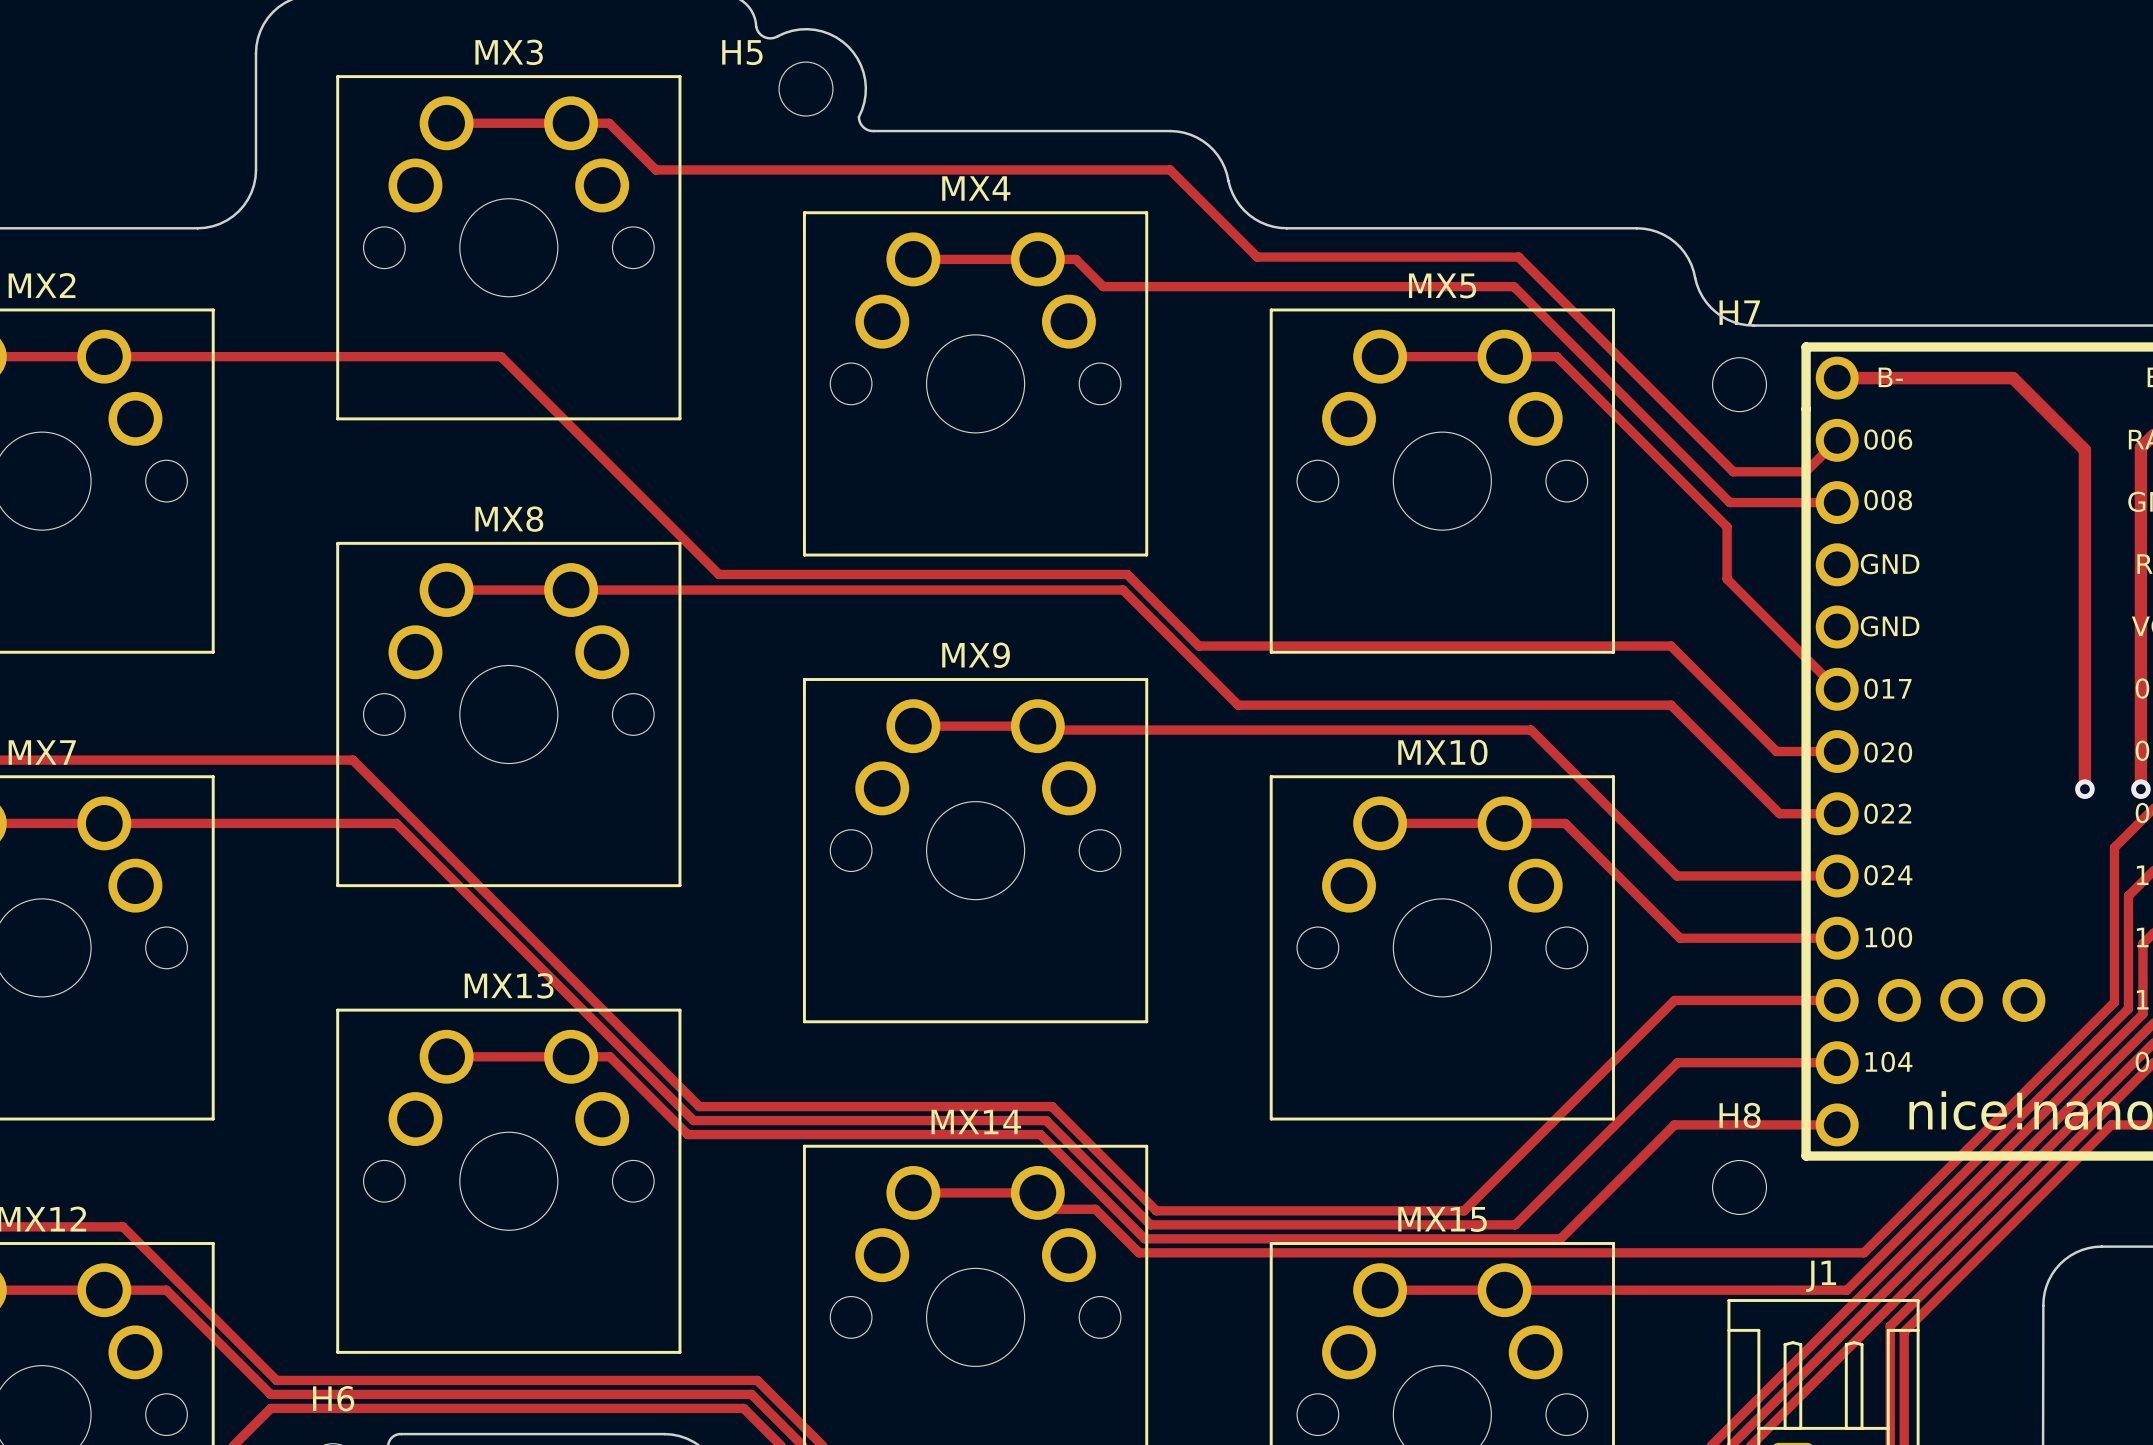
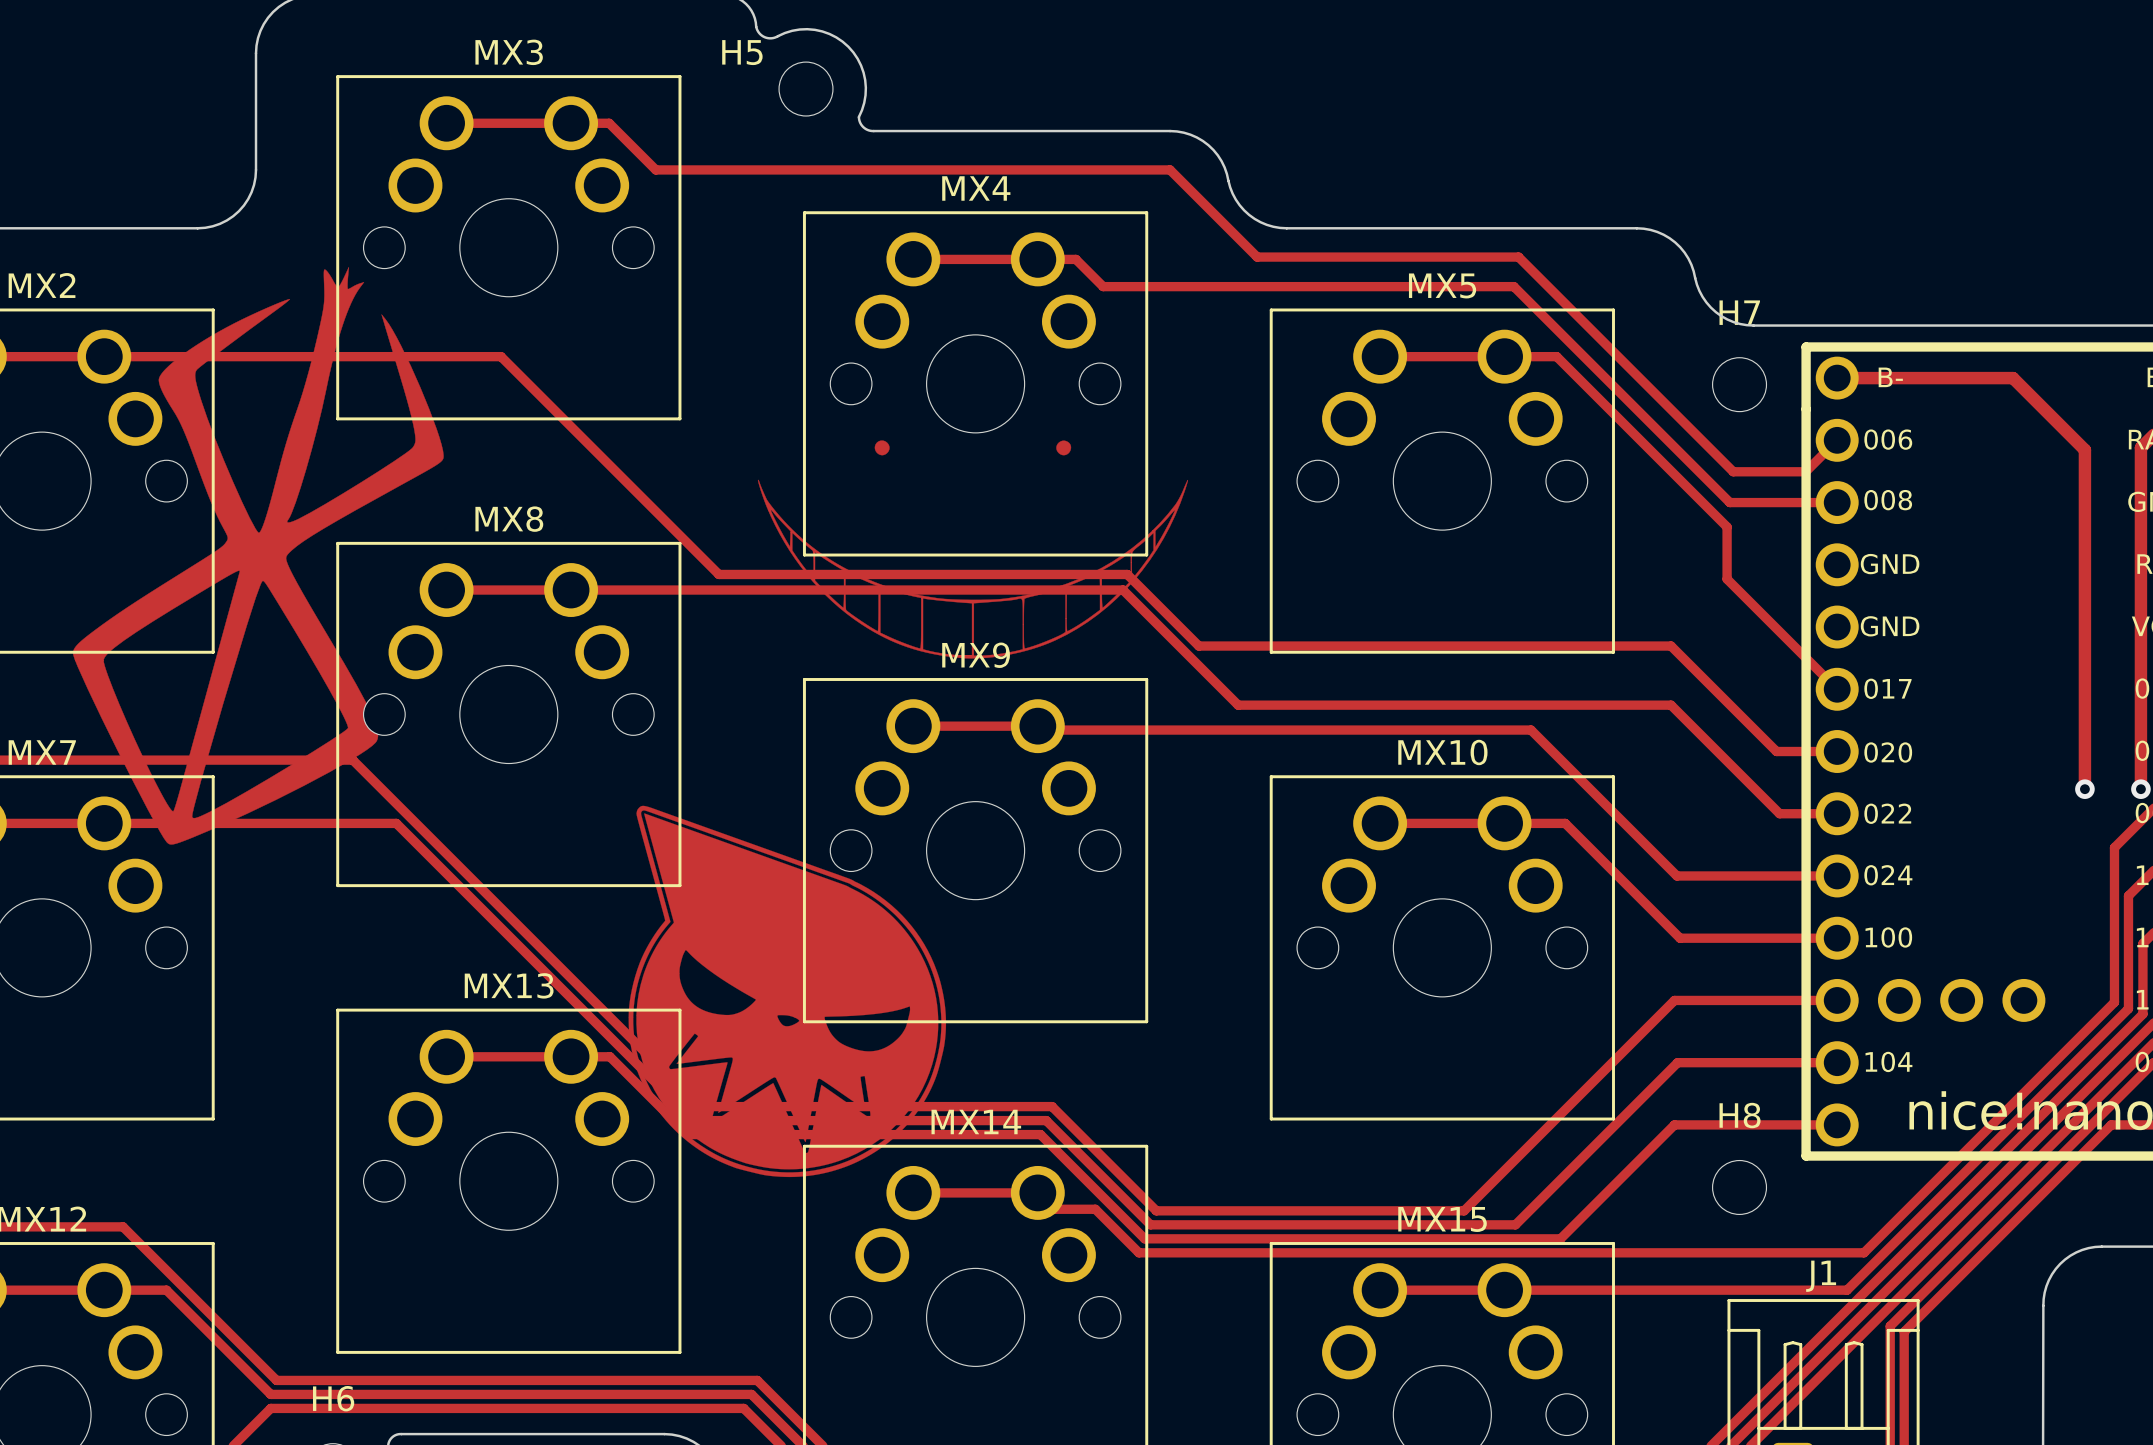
drawing: none -> [72, 266, 444, 845]
drawing: none -> [757, 440, 1189, 659]
drawing: none -> [628, 805, 947, 1178]

